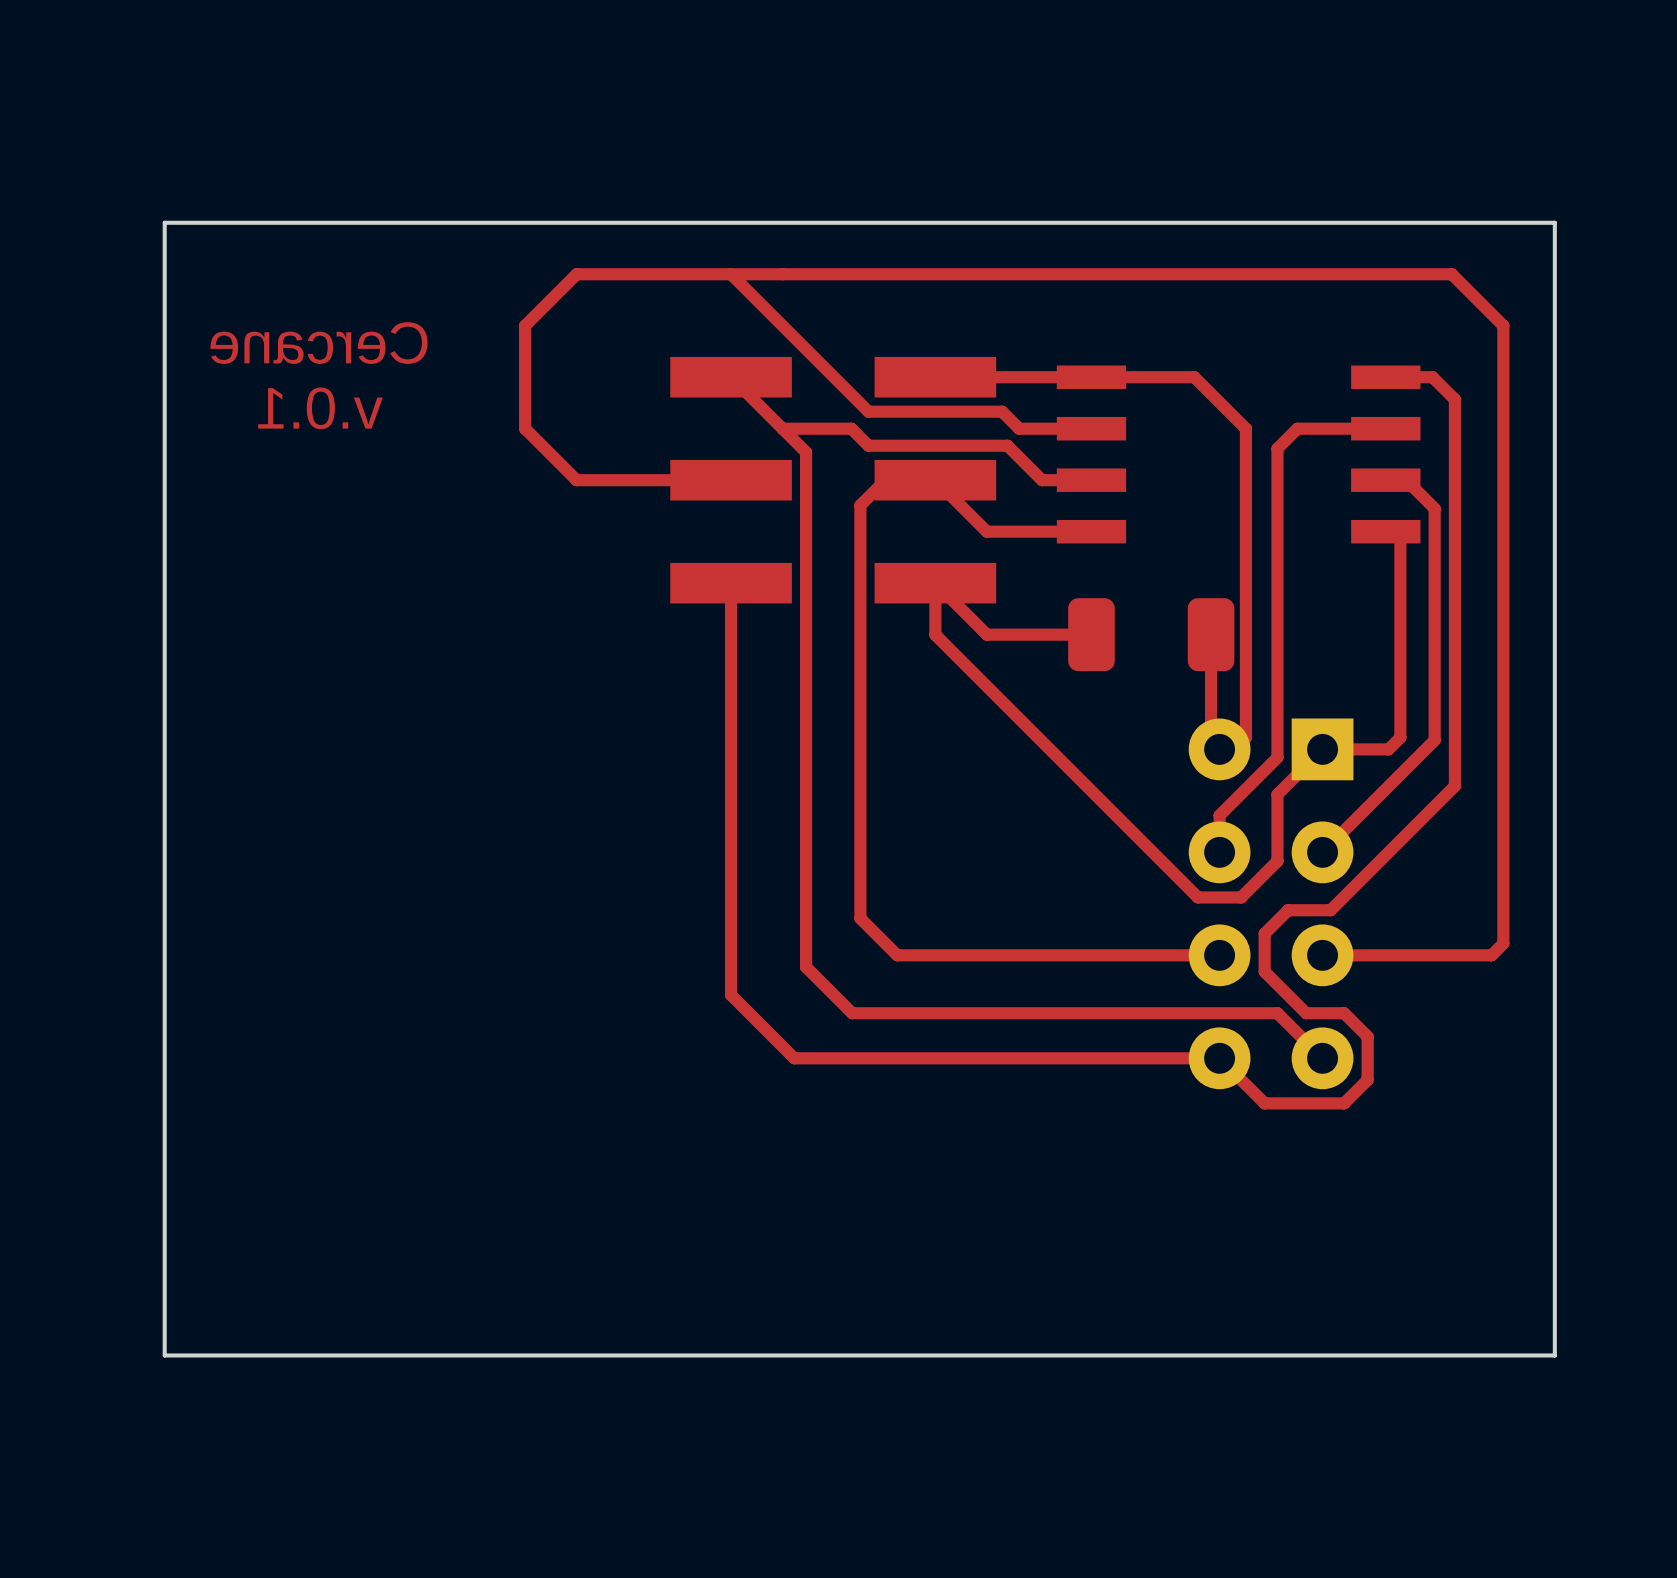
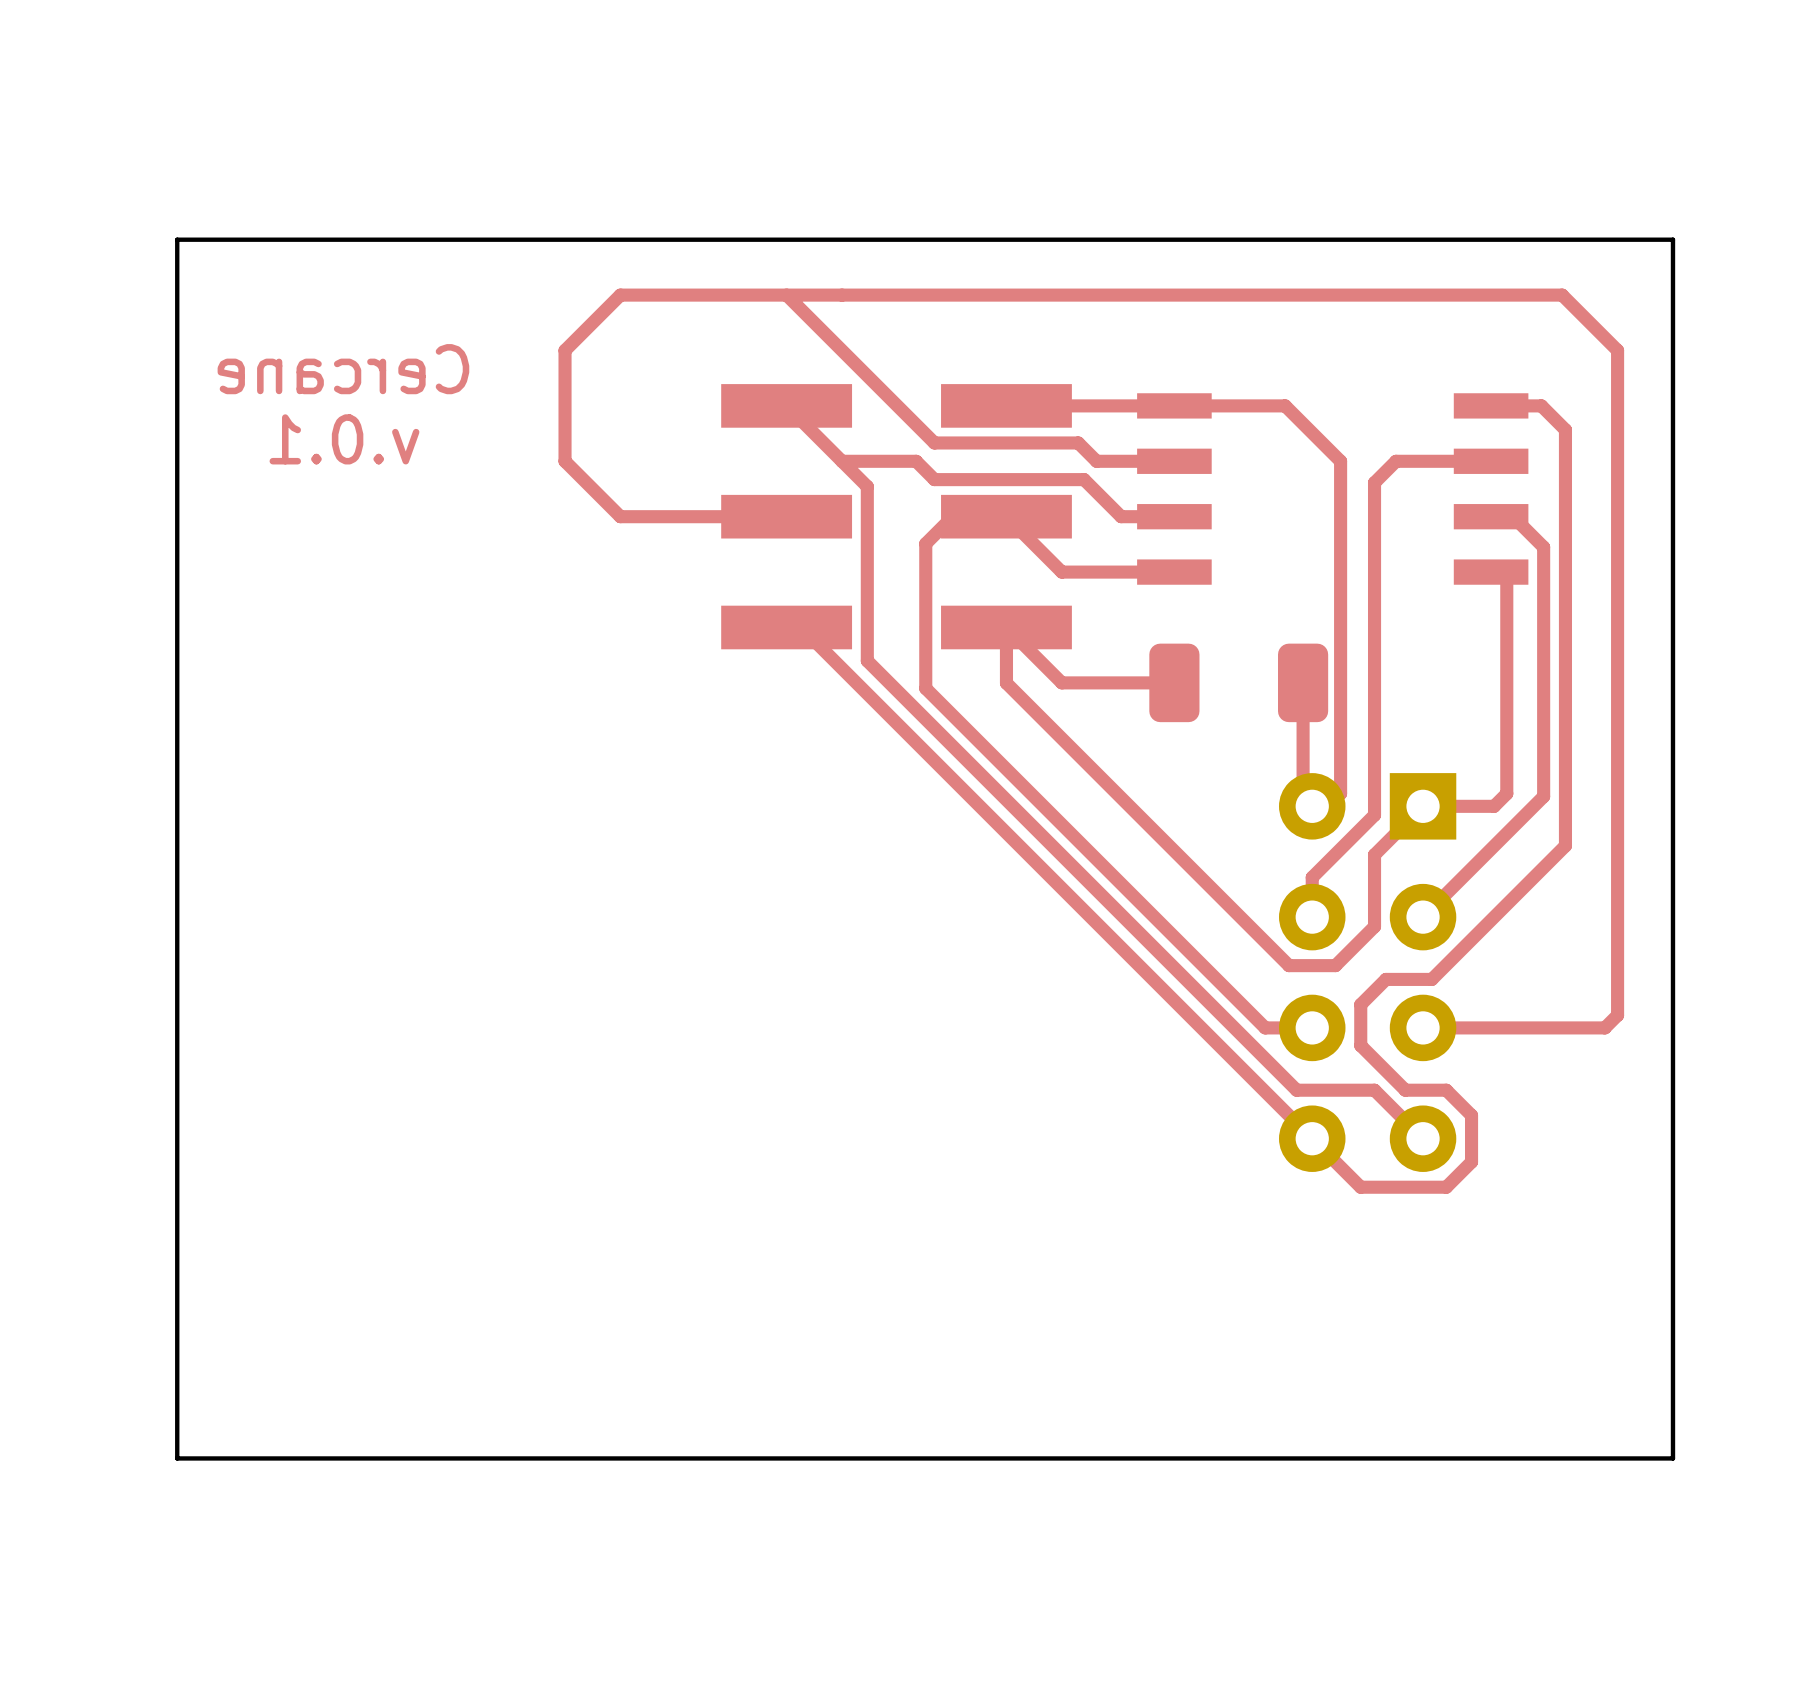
top track: (731, 583) (731, 995) (794, 1058) (1219, 1058) -> (801, 627) (1312, 1138)
top track: (806, 614) (806, 967) (852, 1013) (1205, 1013) -> (867, 660) (1296, 1090)
top track: (860, 639) (860, 918) (897, 955) (1175, 955) -> (925, 688) (1265, 1027)

